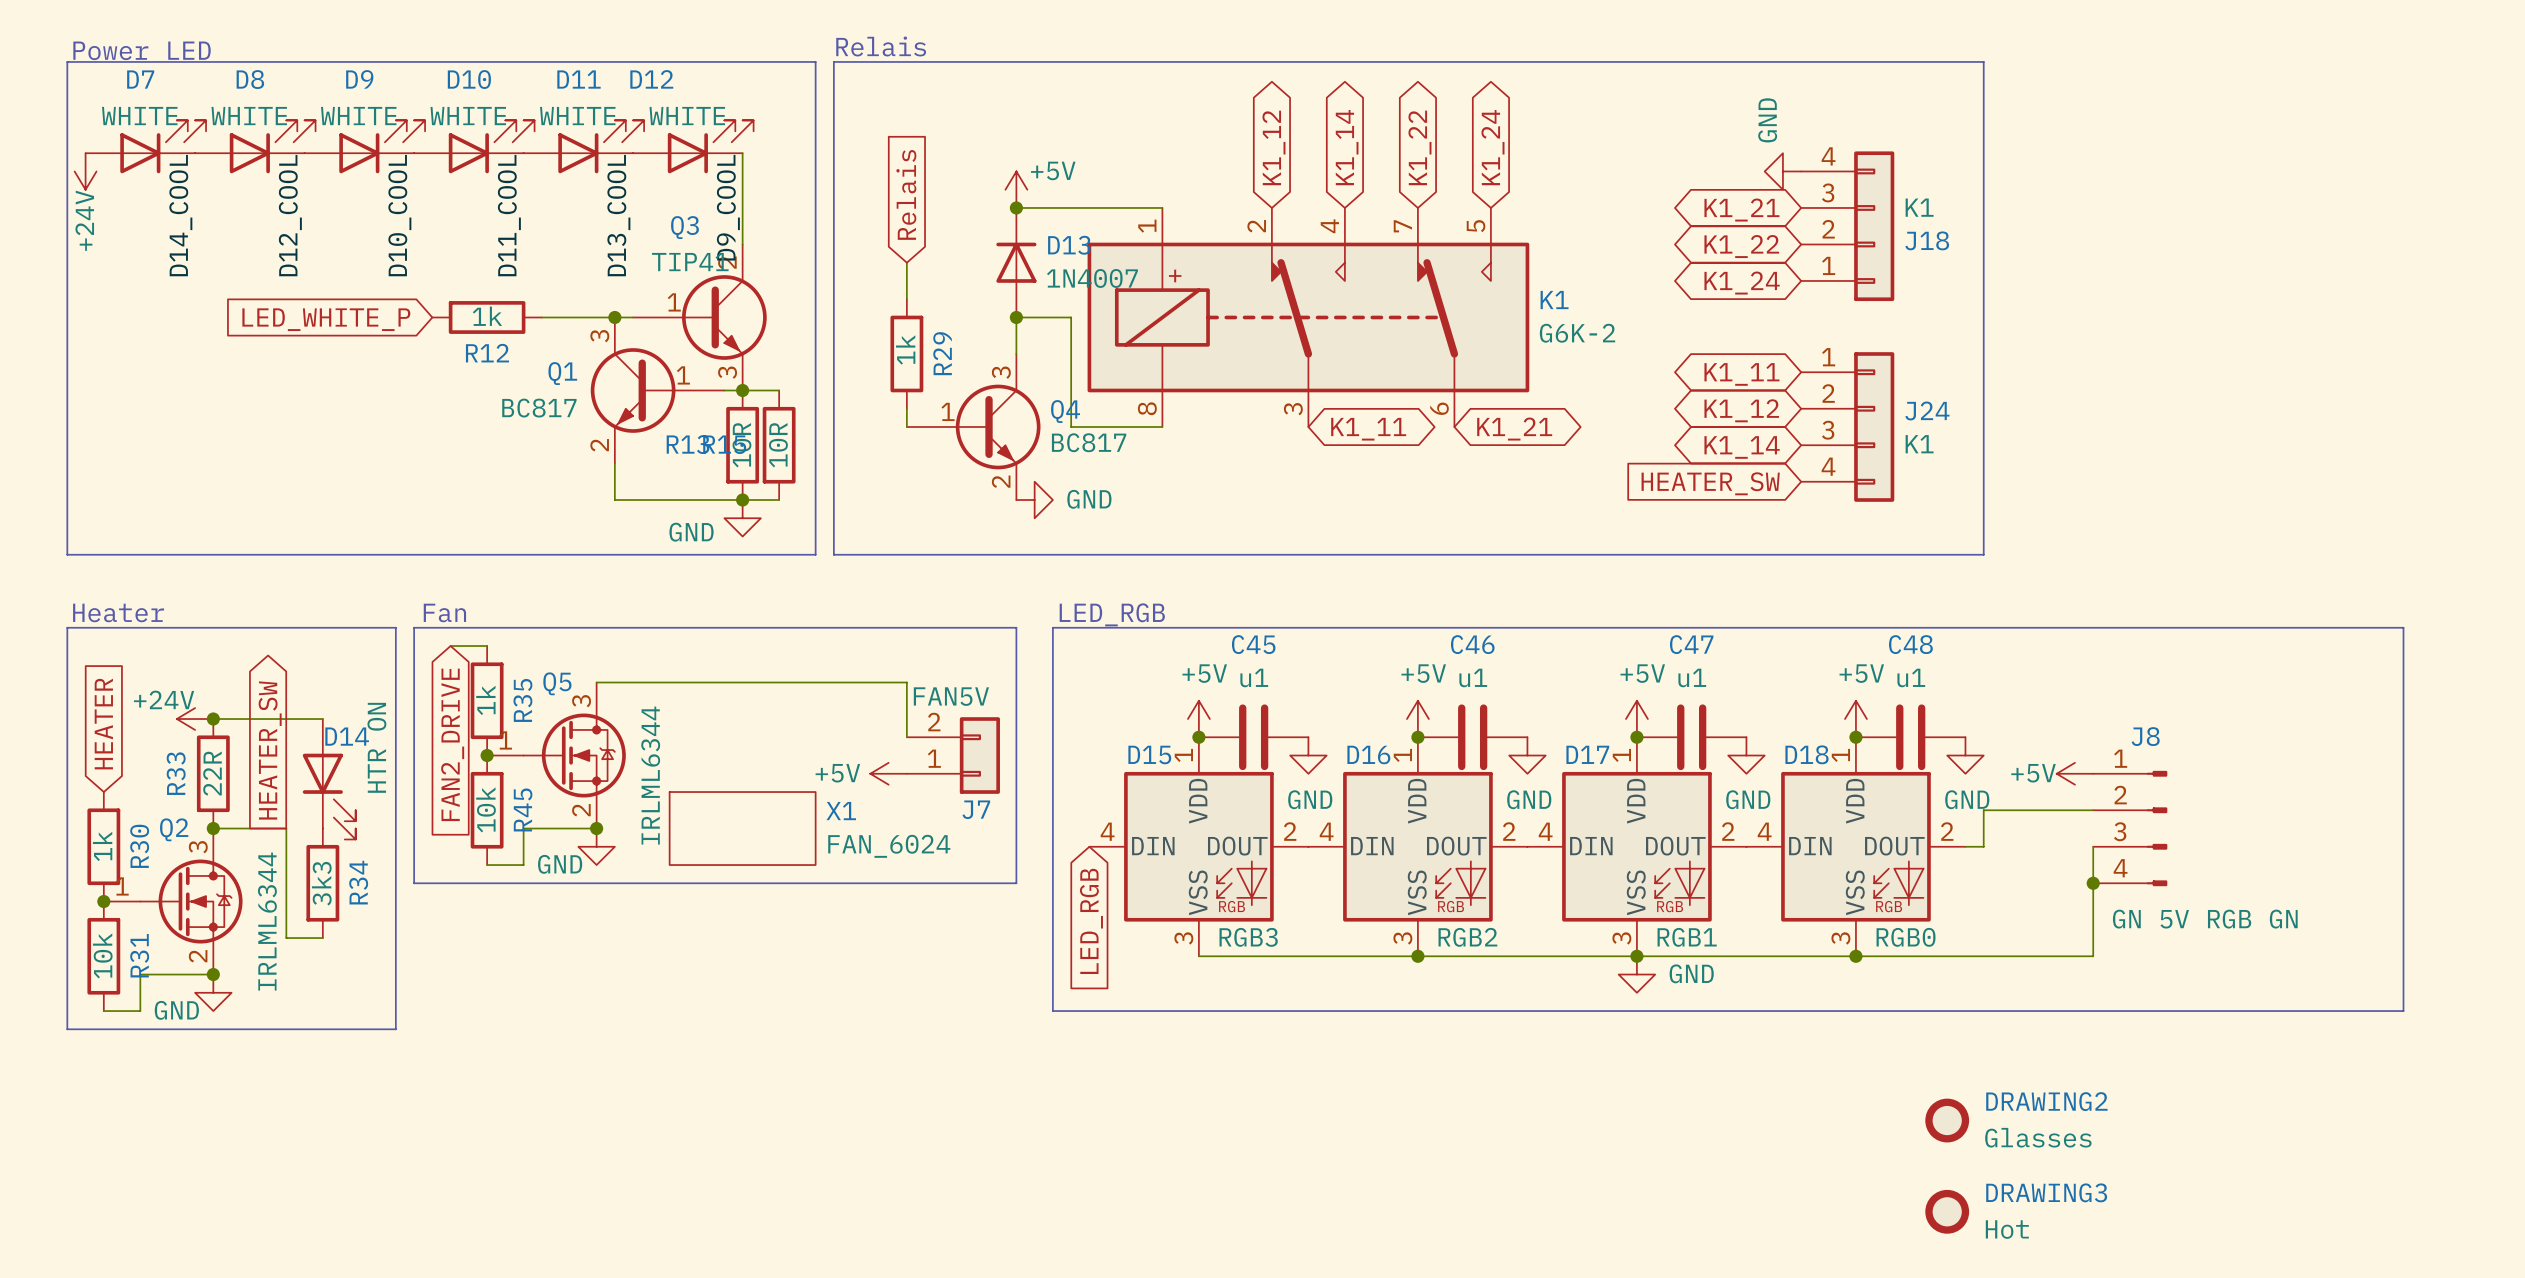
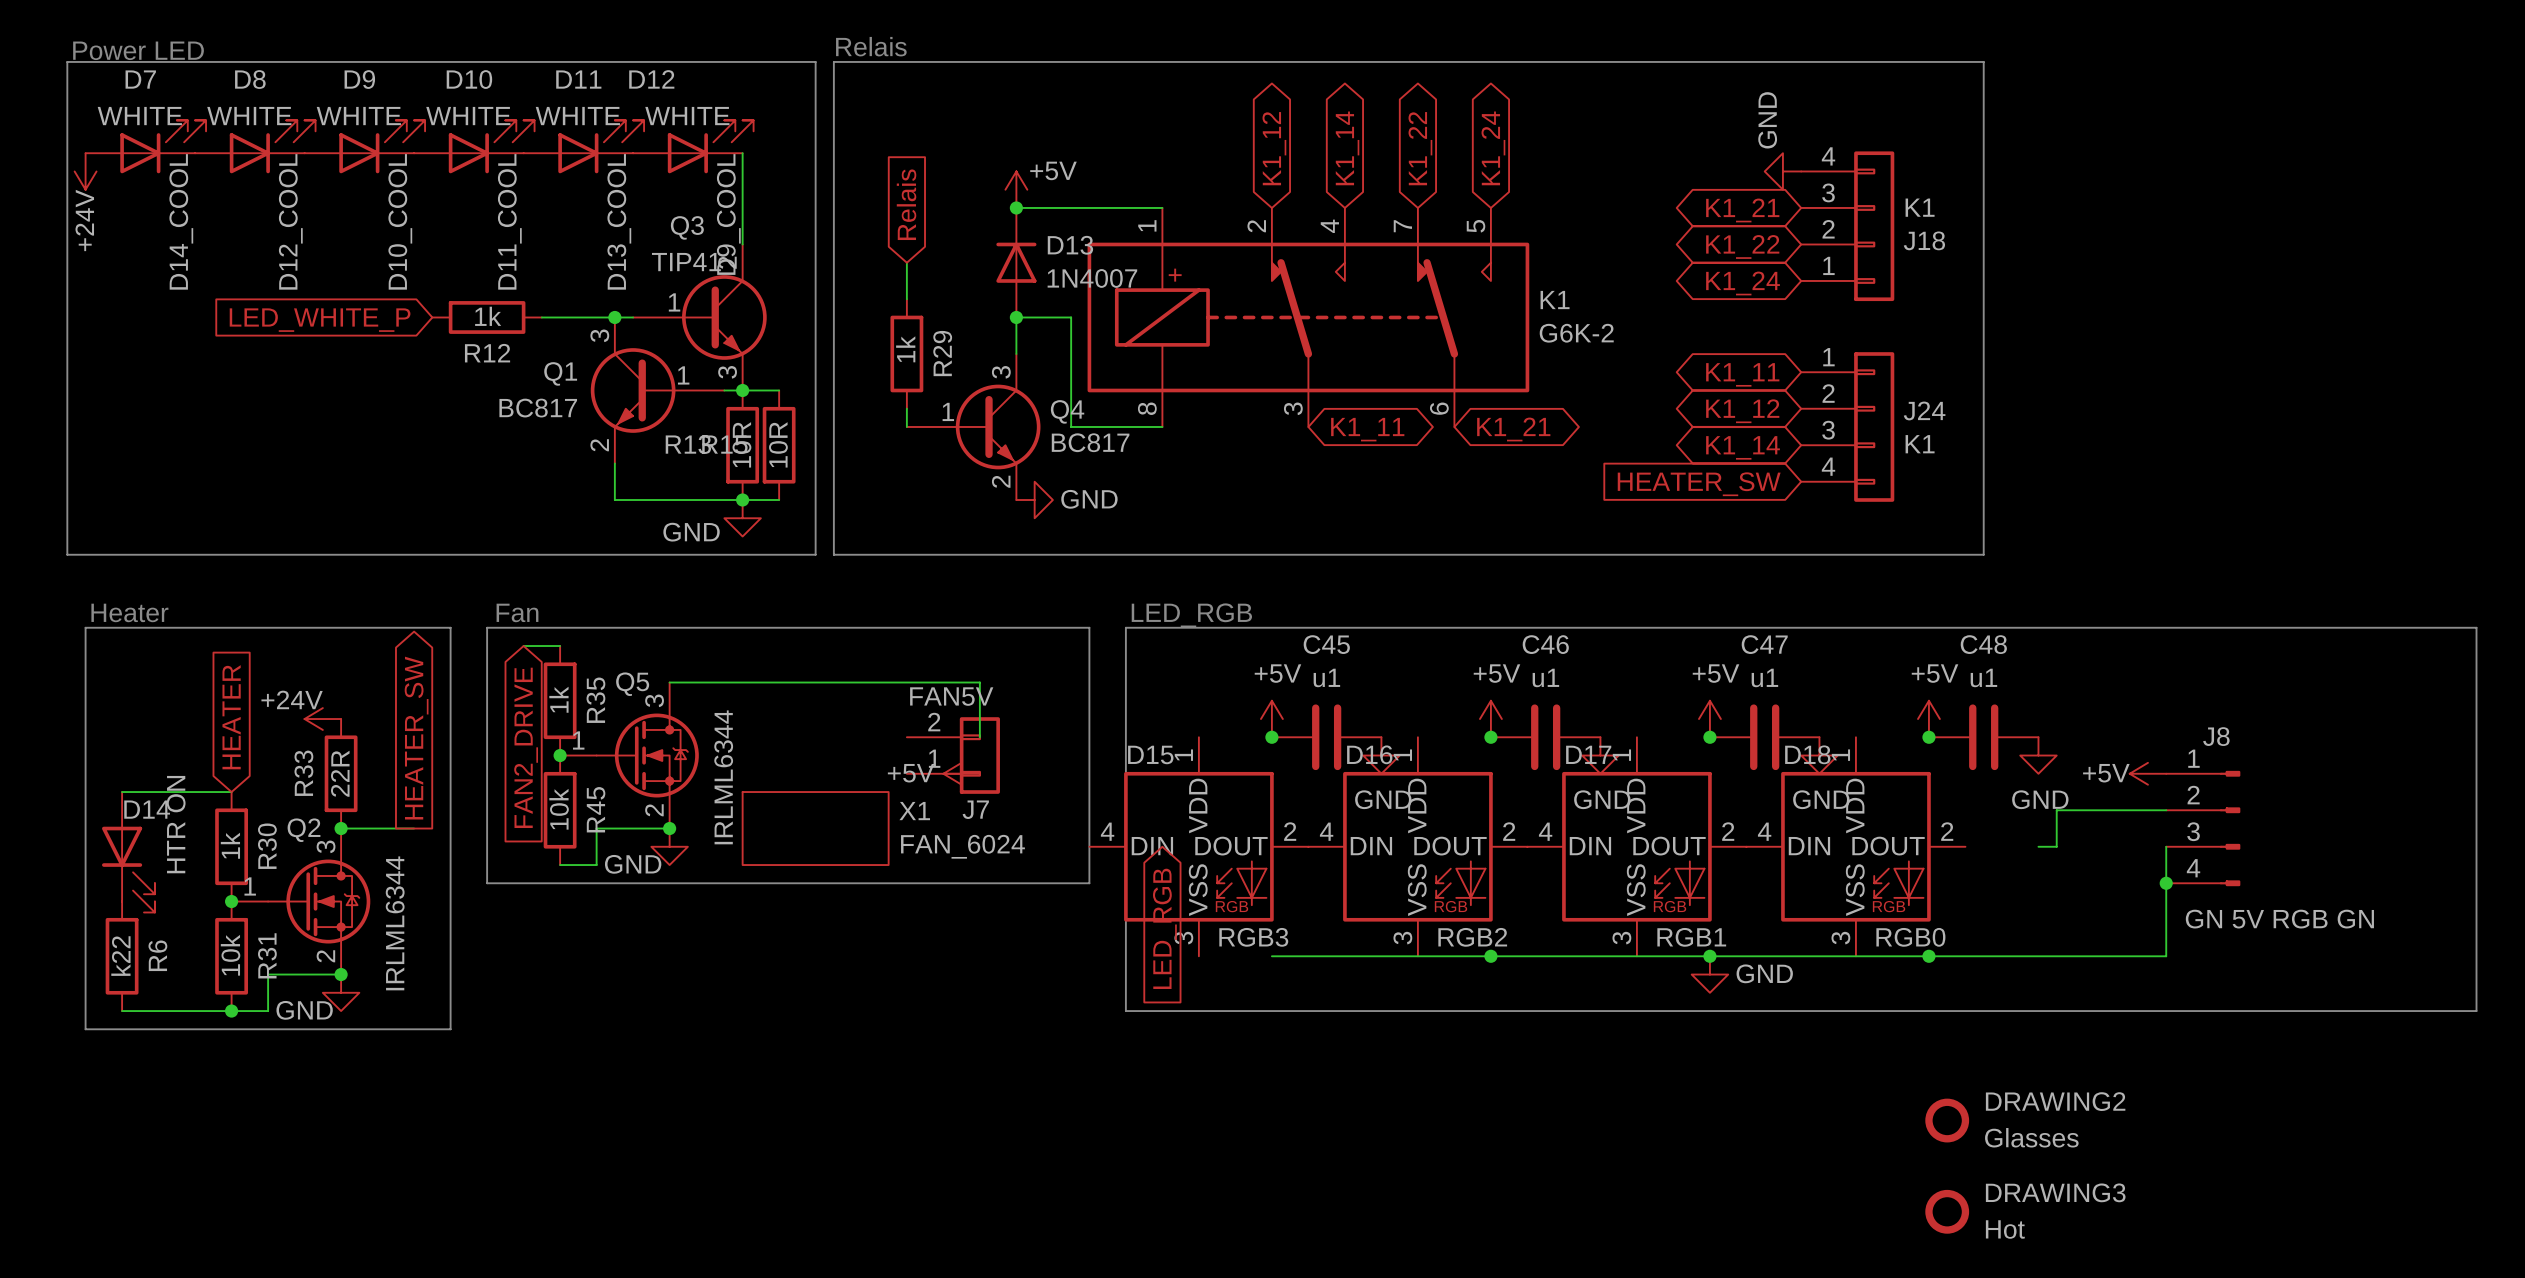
text position: Heater (118, 612) -> Heater (129, 612)
text position: Fan (444, 612) -> Fan (517, 612)
text position: LED_RGB (1112, 614) -> LED_RGB (1191, 615)
line: (85, 627) (67, 627) (67, 1029) (85, 1029) -> (85, 627) (85, 1029)
line: (395, 627) (395, 1029) -> (450, 627) (450, 1029) (395, 1029)
line: none -> (395, 627) (414, 627)
line: (414, 627) (414, 883) (487, 883) -> (487, 627) (487, 883)
line: (450, 627) (487, 627) -> none
line: (1016, 627) (1016, 883) -> (1089, 627) (1089, 883) (1016, 883)
line: (1052, 627) (1052, 1011) (1125, 1011) -> (1125, 627) (1125, 1011)
line: (1089, 627) (1125, 627) -> (1016, 627) (1052, 627)
line: (2403, 627) (2403, 1011) -> (2403, 627) (2476, 627) (2476, 1011) (2403, 1011)
wire: (450, 646) (487, 646) -> (523, 646) (560, 646)
wire: (596, 682) (669, 682) -> (341, 828) (414, 828)
wire: (906, 682) (906, 737) -> (906, 682) (979, 682) (979, 737)
R35 position: (487, 700) -> (560, 700)
power symbol position: +24V (195, 719) -> +24V (322, 719)
wire: (213, 719) (322, 719) -> (122, 792) (231, 792)
junction: (213, 719) -> none
power symbol: +5V (1198, 719) -> none
power symbol: none -> +5V (1271, 719)
power symbol: +5V (1417, 719) -> none
power symbol: none -> +5V (1490, 719)
power symbol: +5V (1636, 719) -> none
power symbol: none -> +5V (1709, 719)
power symbol: +5V (1855, 719) -> none
power symbol: none -> +5V (1928, 719)
global label position: HEATER (103, 724) -> HEATER (231, 717)
junction: (1198, 737) -> none
C45 position: (1253, 737) -> (1326, 737)
junction: none -> (1271, 737)
junction: (1417, 737) -> none
C46 position: (1472, 737) -> (1545, 737)
junction: none -> (1490, 737)
junction: (1636, 737) -> none
C47 position: (1691, 737) -> (1764, 737)
junction: none -> (1709, 737)
junction: (1855, 737) -> none
C48 position: (1910, 737) -> (1983, 737)
junction: none -> (1928, 737)
global label position: FAN2_DRIVE (452, 744) -> FAN2_DRIVE (526, 747)
global label position: HEATER_SW (270, 750) -> HEATER_SW (416, 738)
junction: (487, 755) -> none
Q5 position: (556, 755) -> (629, 755)
junction: none -> (560, 755)
power symbol: GND (1308, 755) -> none
power symbol: none -> GND (1381, 755)
power symbol: GND (1527, 755) -> none
power symbol: none -> GND (1600, 755)
power symbol: GND (1746, 755) -> none
power symbol: none -> GND (1819, 755)
power symbol: GND (1965, 755) -> none
power symbol: none -> GND (2038, 755)
R33 position: (213, 773) -> (341, 773)
power symbol position: +5V (888, 773) -> +5V (961, 773)
power symbol position: +5V (2074, 773) -> +5V (2147, 773)
D14 position: (329, 779) -> (128, 852)
R45 position: (487, 810) -> (560, 810)
wire: (2056, 810) (1983, 810) (1983, 846) (1965, 846) -> (2056, 810) (2056, 846) (2038, 846)
wire: (213, 828) (286, 828) (286, 938) (322, 938) -> none
junction: (213, 828) -> none
junction: none -> (341, 828)
wire: (596, 828) (523, 828) (523, 865) (487, 865) -> (669, 828) (596, 828) (596, 865) (560, 865)
junction: (596, 828) -> none
junction: none -> (669, 828)
X1 position: (742, 828) -> (815, 828)
J8 position: (2130, 828) -> (2203, 828)
R30 position: (103, 846) -> (231, 846)
power symbol position: GND (596, 846) -> GND (669, 846)
wire: (2093, 846) (2093, 956) -> (2166, 846) (2166, 956) (2093, 956)
R34: 3k3 (322, 883) -> none
junction position: (2093, 883) -> (2166, 883)
junction: (103, 901) -> none
Q2 position: (173, 901) -> (300, 901)
junction: none -> (231, 901)
global label position: LED_RGB (1091, 921) -> LED_RGB (1164, 928)
R31 position: (103, 956) -> (231, 956)
R6: none -> k22 (122, 956)
wire: (1198, 956) (1271, 956) -> none
junction: (1417, 956) -> none
junction: none -> (1490, 956)
junction: (1636, 956) -> none
junction: none -> (1709, 956)
junction: (1855, 956) -> none
junction: none -> (1928, 956)
wire: (213, 974) (140, 974) (140, 1011) -> (341, 974) (268, 974) (268, 1011) (140, 1011)
junction: (213, 974) -> none
junction: none -> (341, 974)
power symbol position: GND (1636, 974) -> GND (1709, 974)
power symbol position: GND (213, 992) -> GND (341, 992)
wire: (103, 1011) (122, 1011) -> none
junction: none -> (231, 1011)

